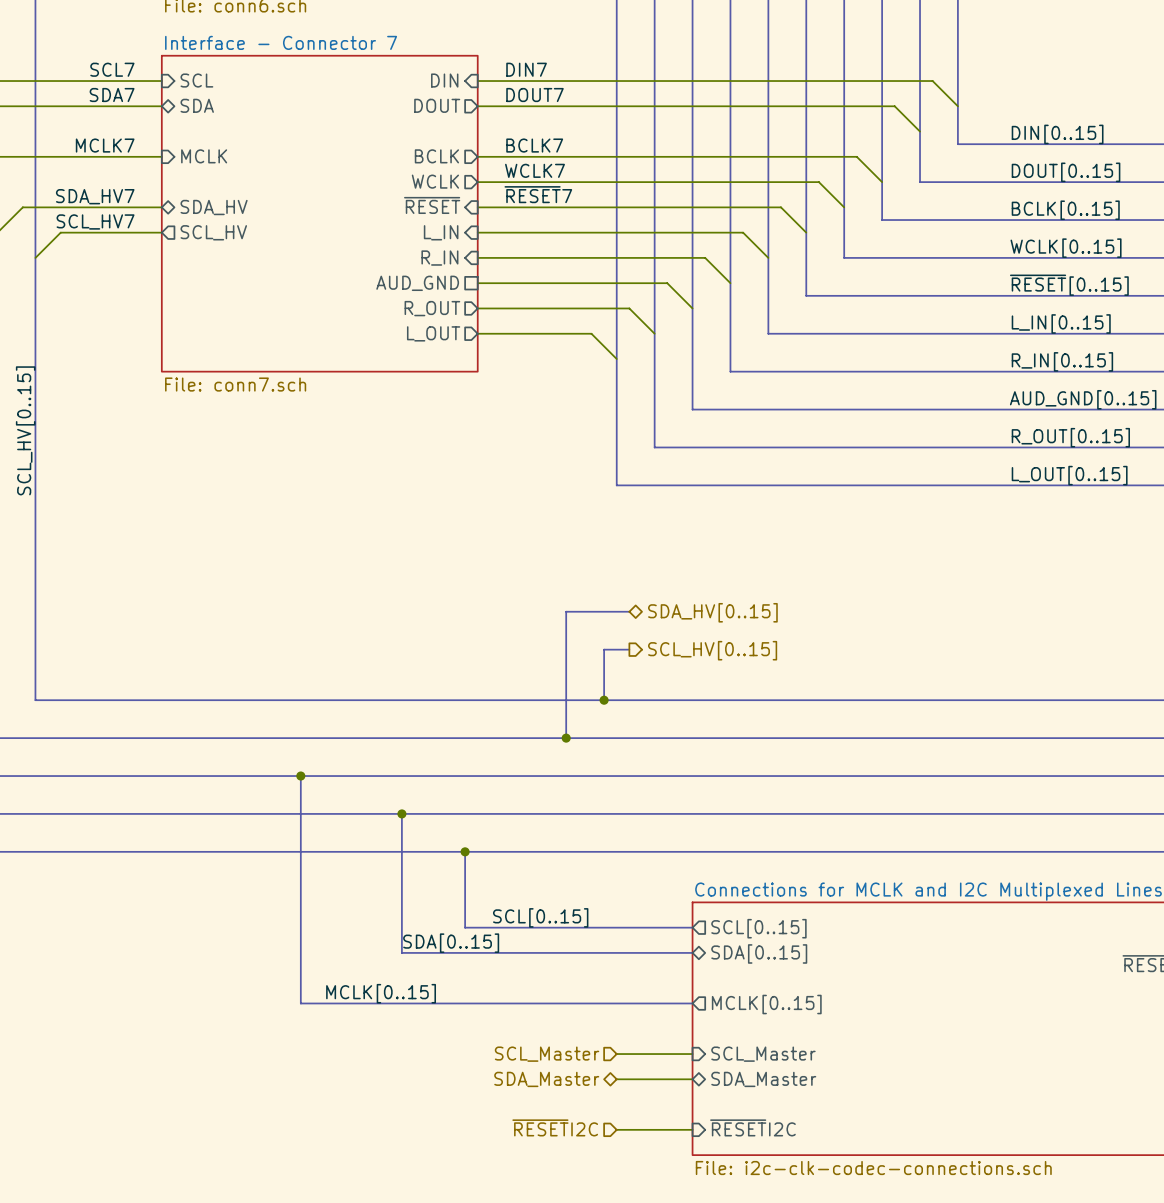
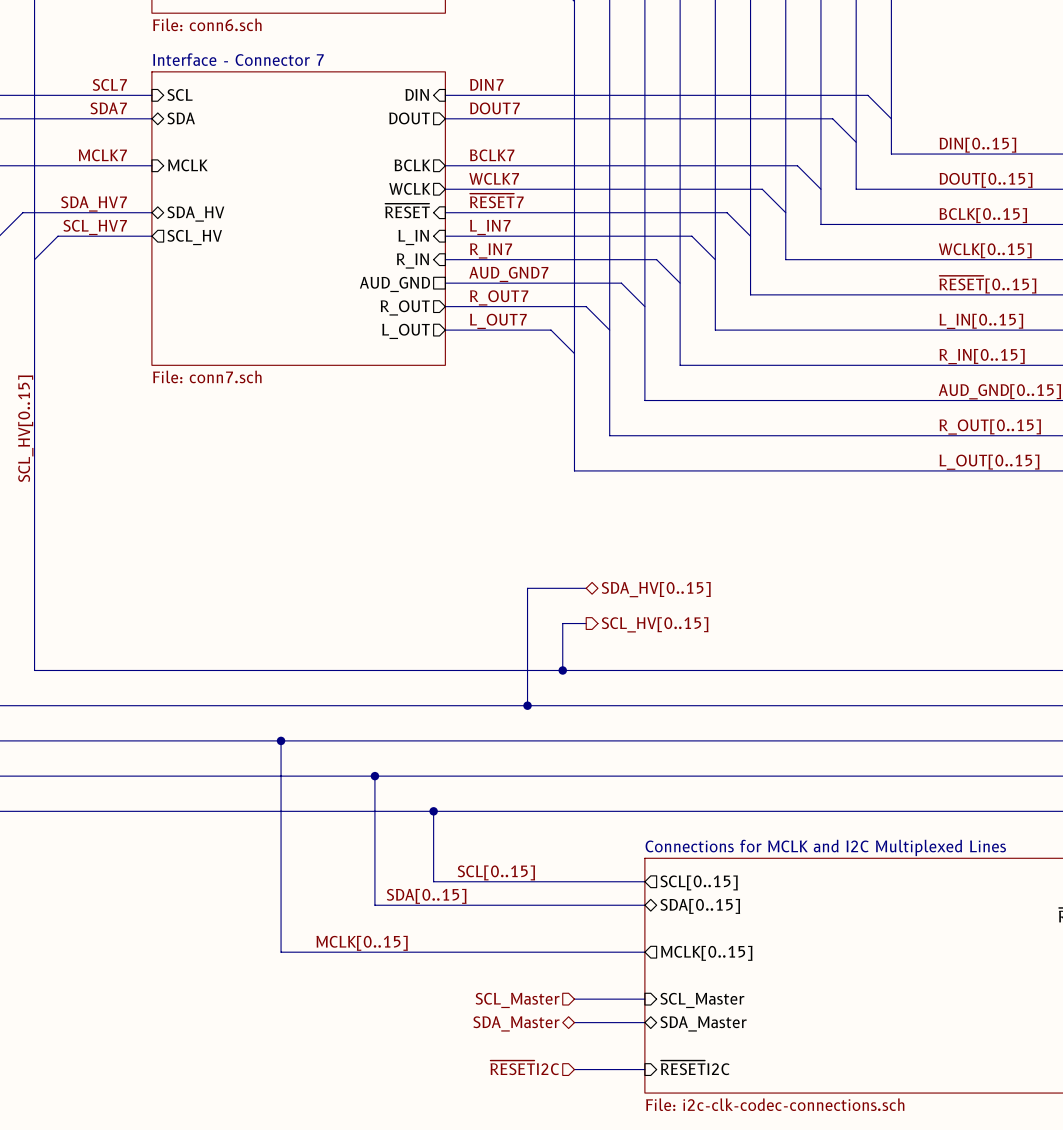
label: none -> L_IN7 (490, 227)
label: none -> R_IN7 (491, 250)
label: none -> AUD_GND7 (508, 274)
label: none -> R_OUT7 (499, 297)
label: none -> L_OUT7 (498, 321)

